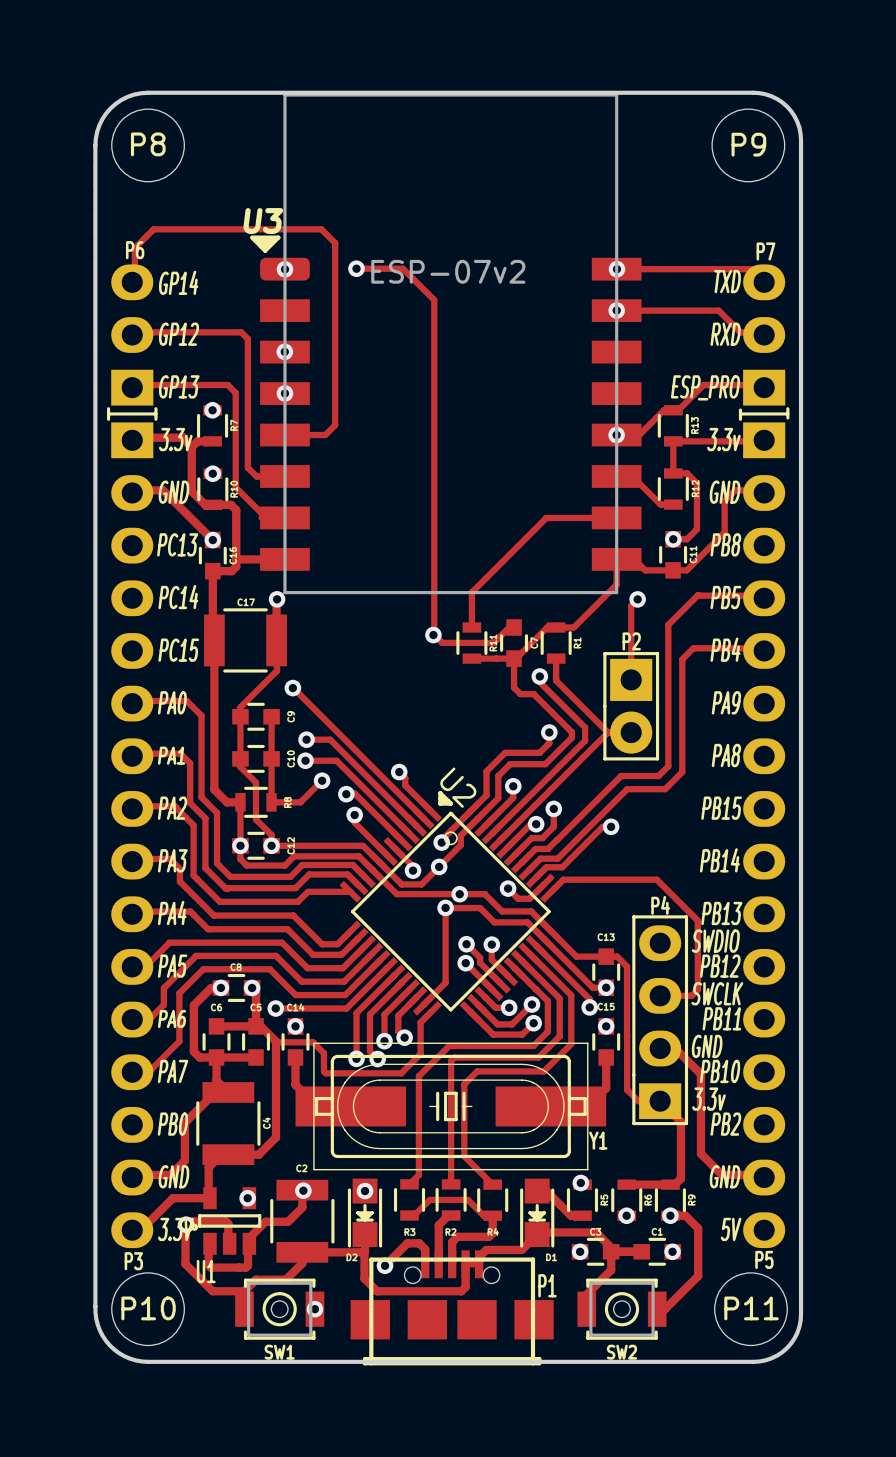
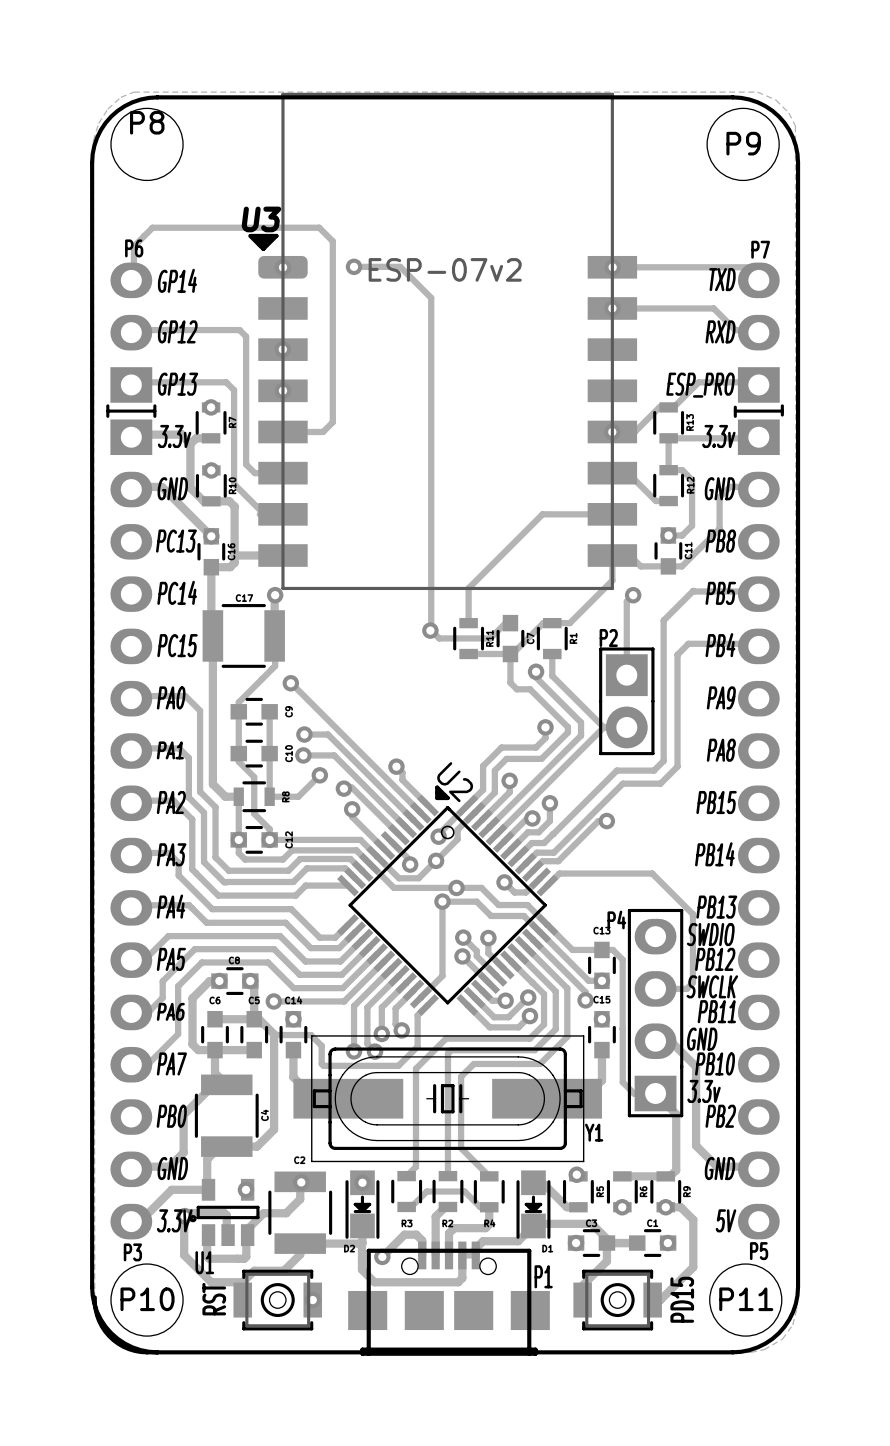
P8 name position: P8 (148, 144) -> P8 (147, 122)
P2 name position: P2 (631, 641) -> P2 (608, 637)
P4 name position: P4 (660, 905) -> P4 (616, 919)
board edge: (95, 1306) (95, 145) (97, 131) (102, 119) (110, 108) (121, 99) (134, 94) (148, 92) (759, 93) (777, 99) (787, 106) (797, 122) (801, 140) (801, 1314) (797, 1332) (791, 1343) (782, 1352) (765, 1360) (737, 1361) -> (157, 1352) (132, 1347) (111, 1333) (97, 1311) (92, 1286) (92, 162) (97, 137) (105, 122) (117, 110) (140, 99) (157, 97) (732, 97) (757, 102) (778, 116) (793, 137) (798, 162) (798, 1286) (793, 1311) (778, 1333) (757, 1347) (732, 1352)
part value: SW1 (279, 1352) -> RST (214, 1299)
SW2 name: SW2 (621, 1352) -> PD15 (682, 1299)

